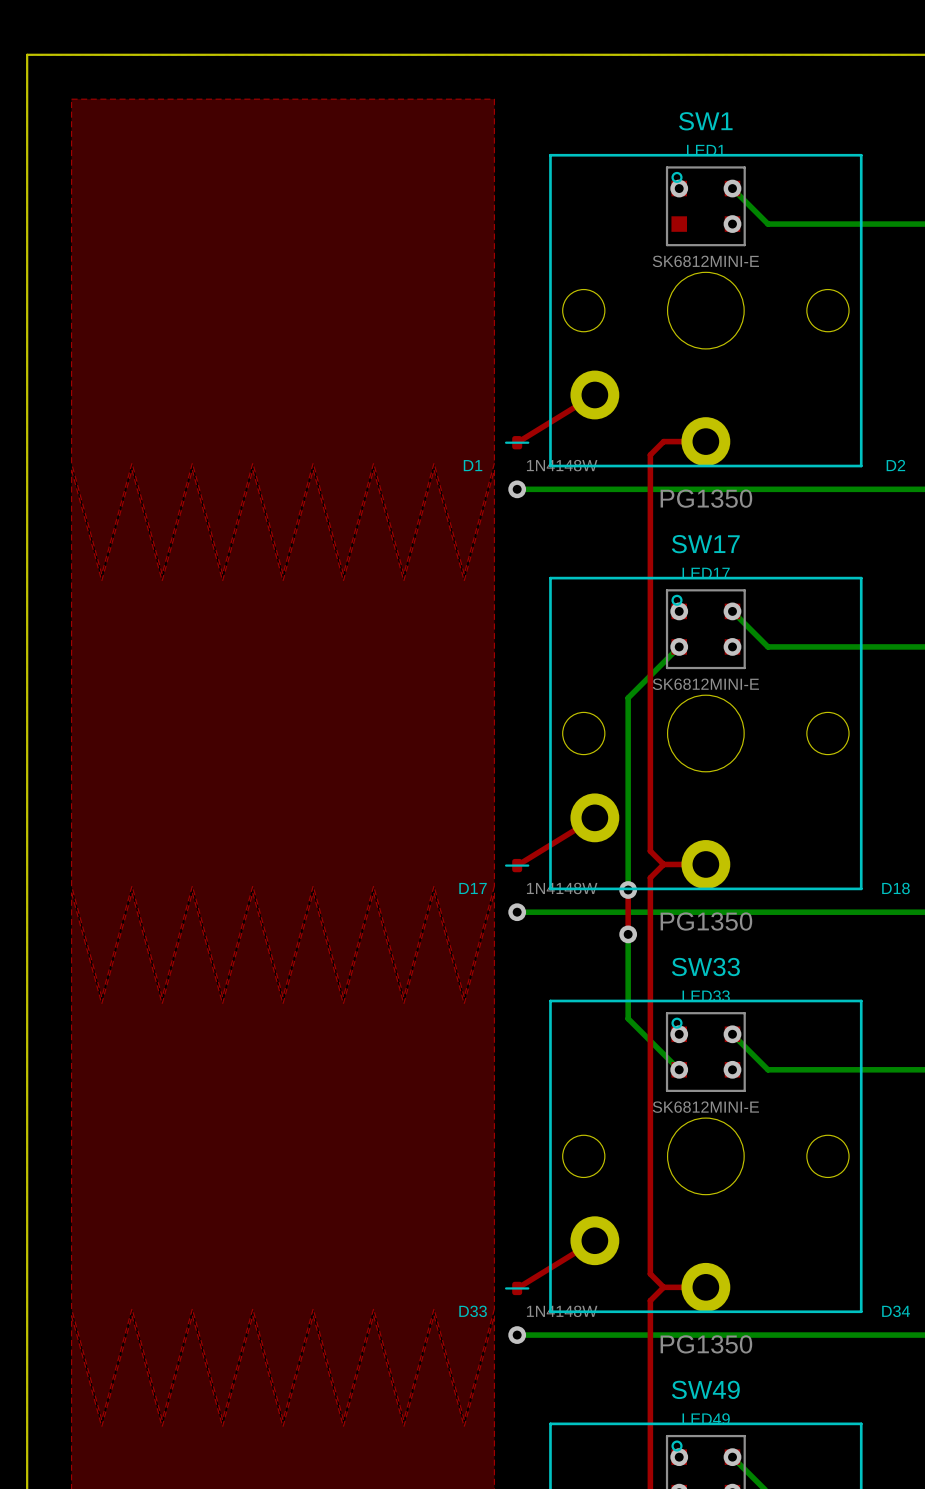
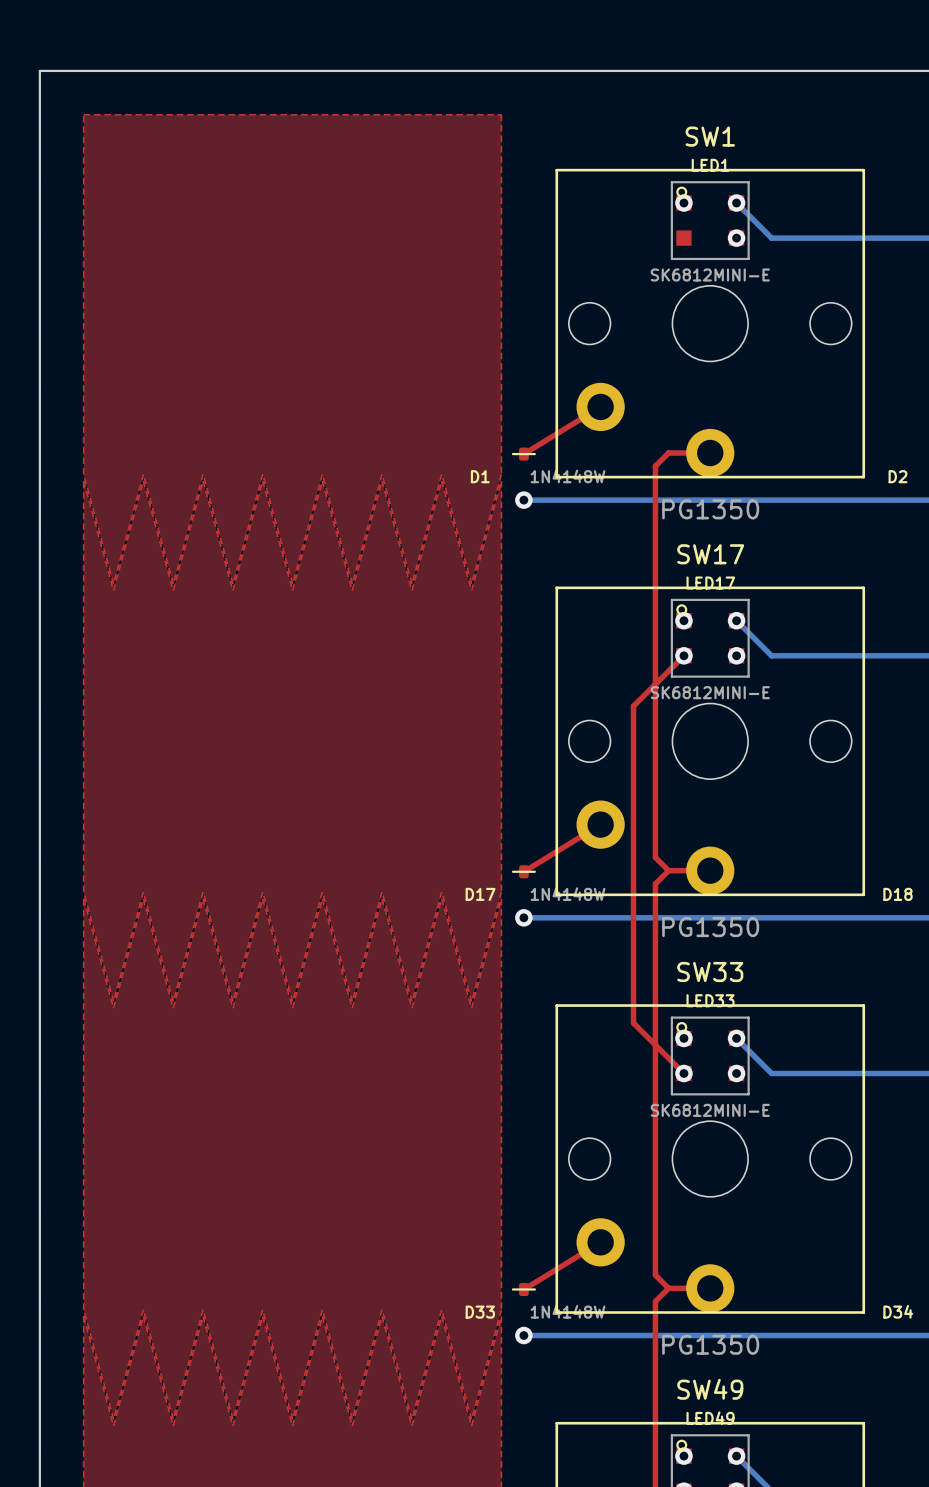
top track: none -> (683, 655) (633, 706) (633, 895)
bottom track: (679, 646) (628, 697) (628, 889) -> none
via: (628, 889) -> none
top track: none -> (633, 939) (633, 1023) (683, 1073)
bottom track: (628, 934) (628, 1018) (679, 1069) -> none
via: (628, 934) -> none

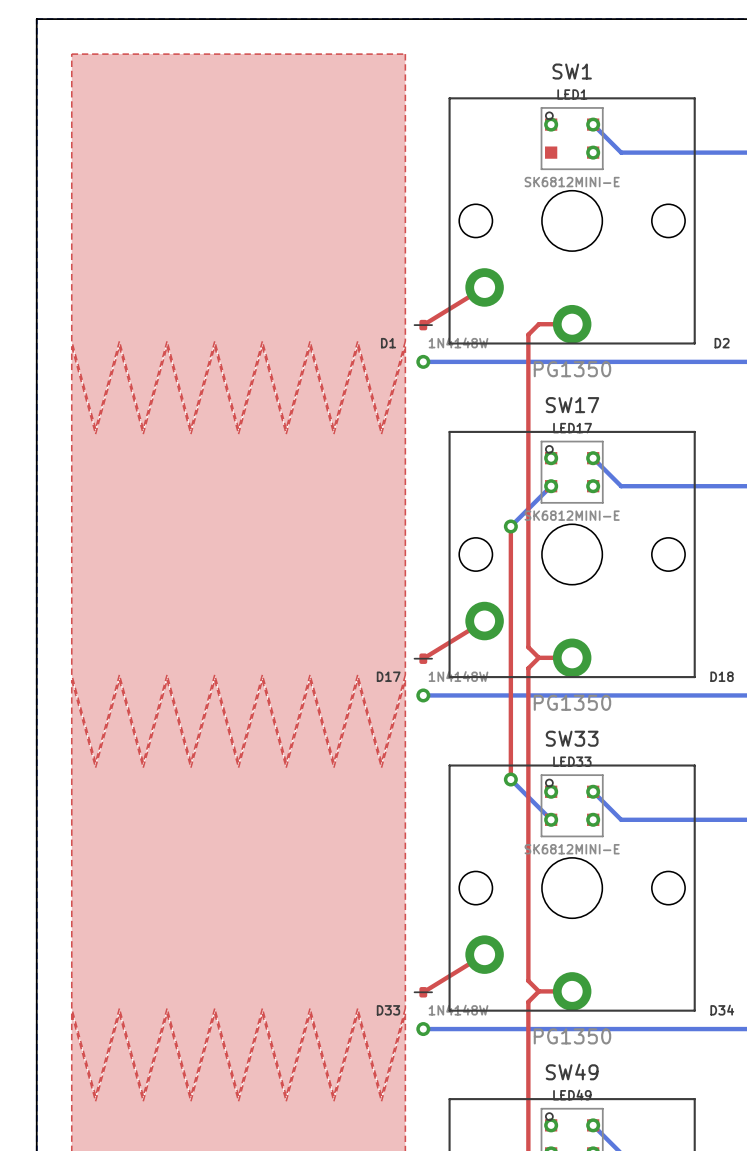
top track: (683, 655) (633, 706) -> none
bottom track: none -> (551, 486) (510, 526)
via: none -> (510, 526)
top track: (633, 1023) (683, 1073) -> none
bottom track: none -> (510, 779) (551, 819)
via: none -> (510, 779)

